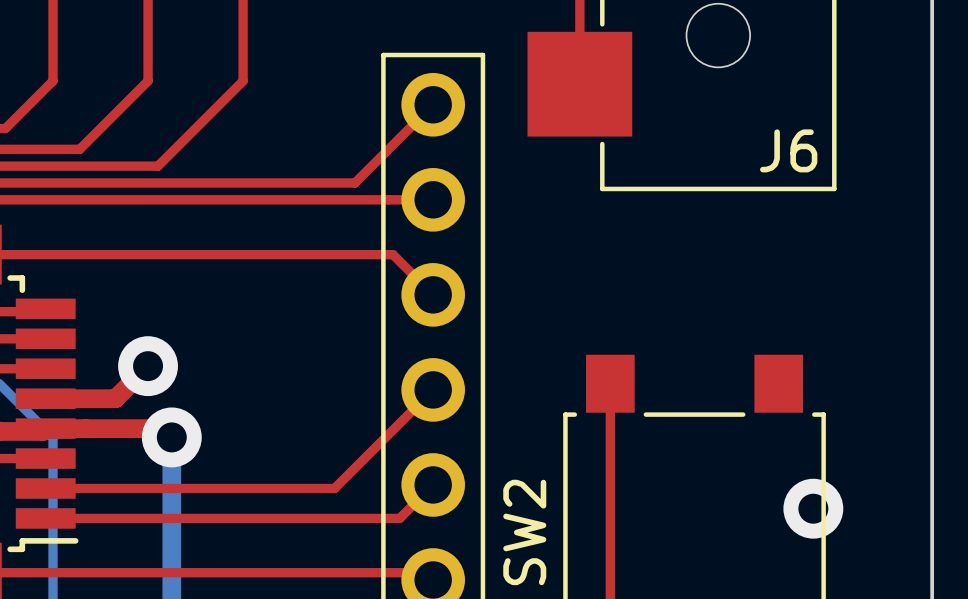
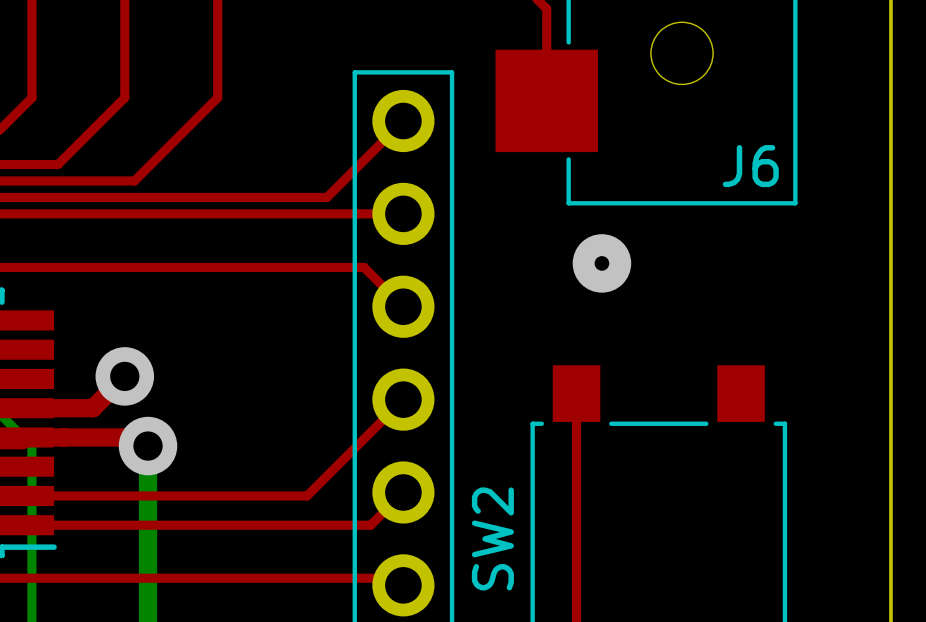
via: none -> (601, 263)
via: (813, 508) -> none

